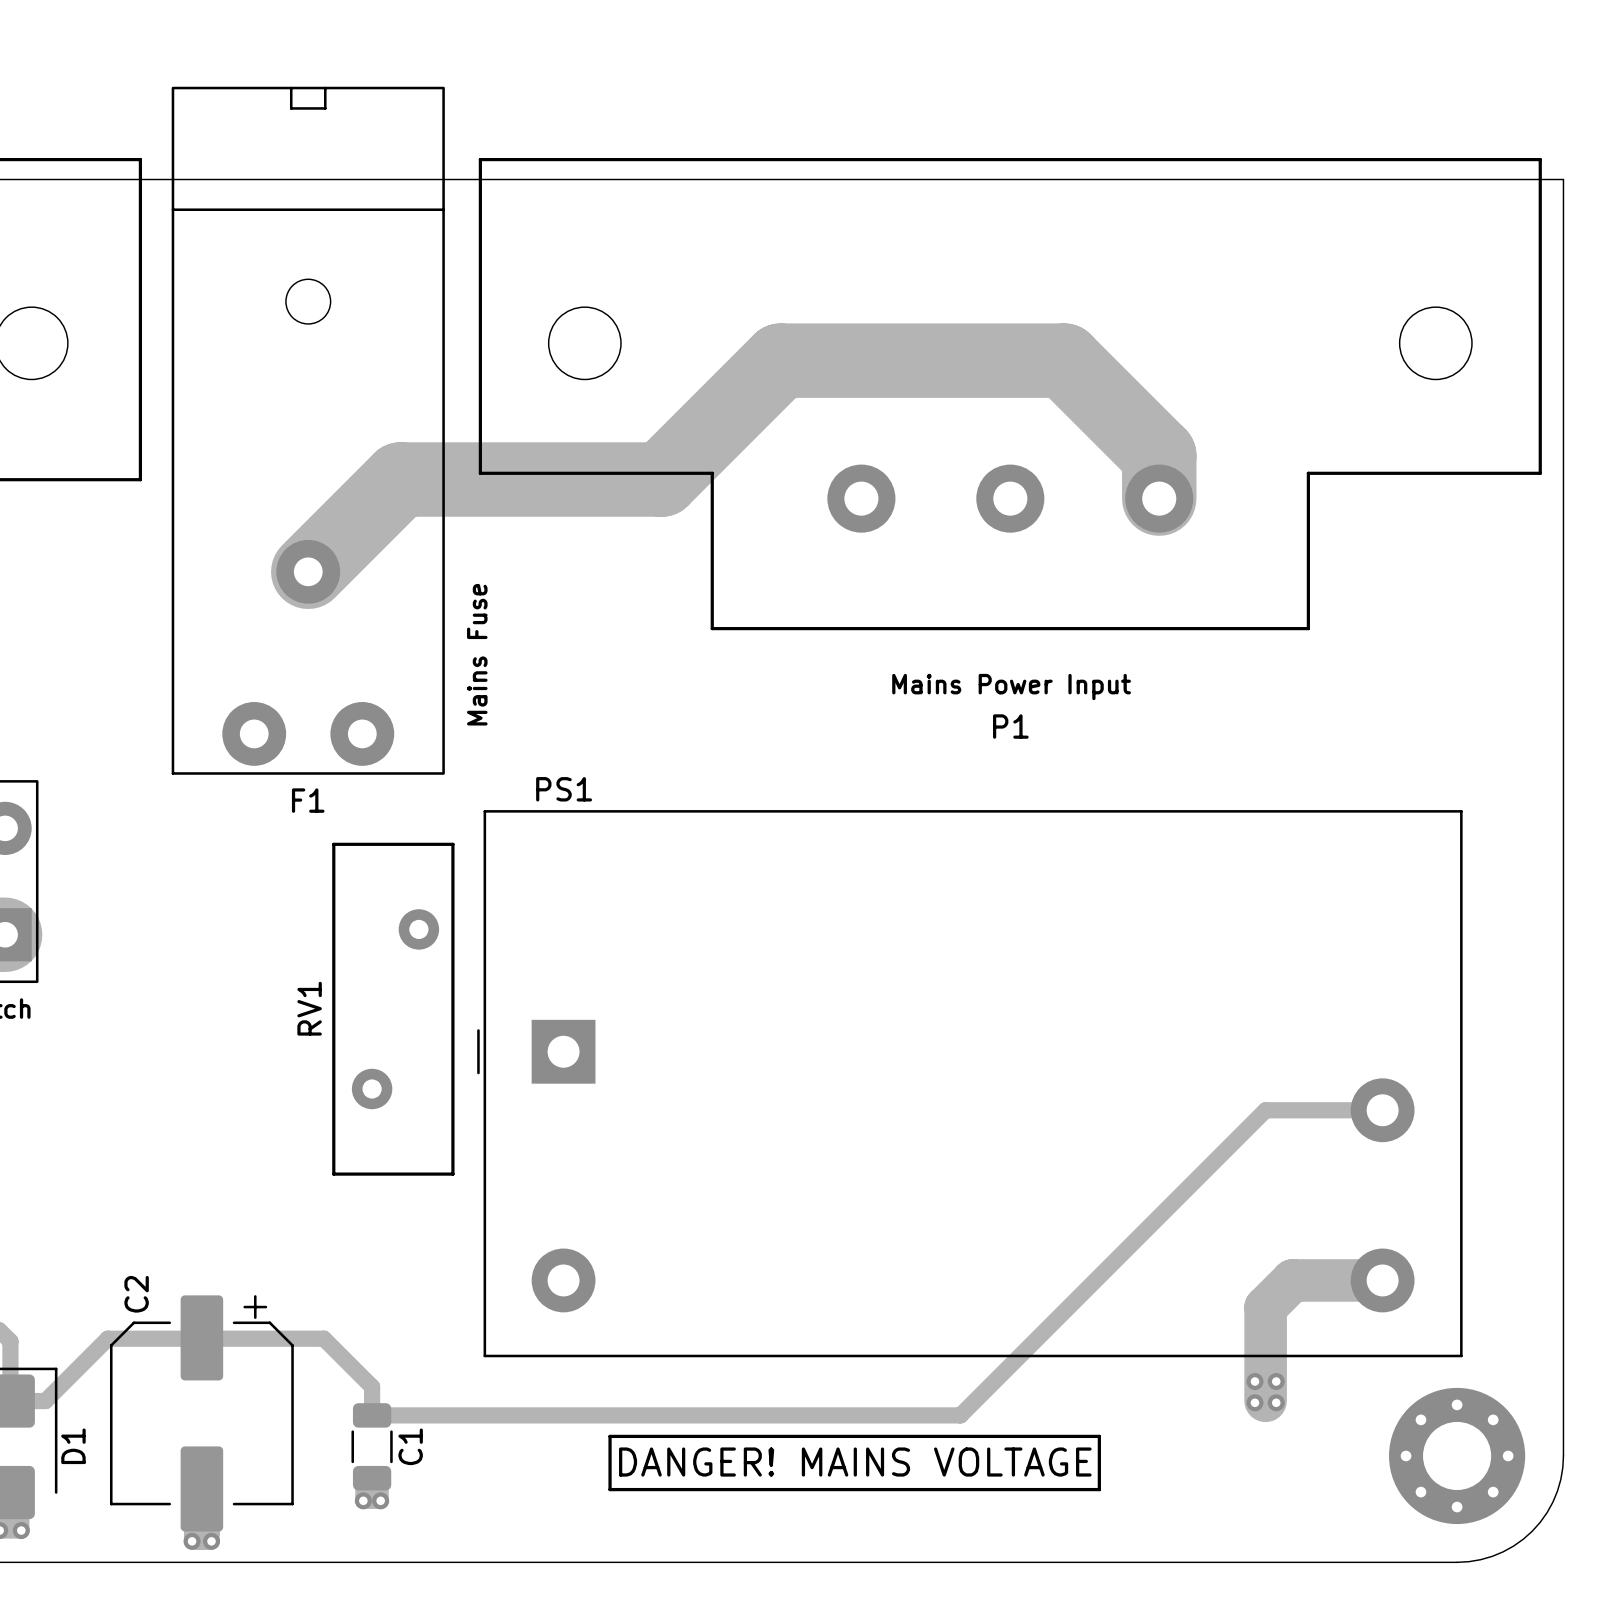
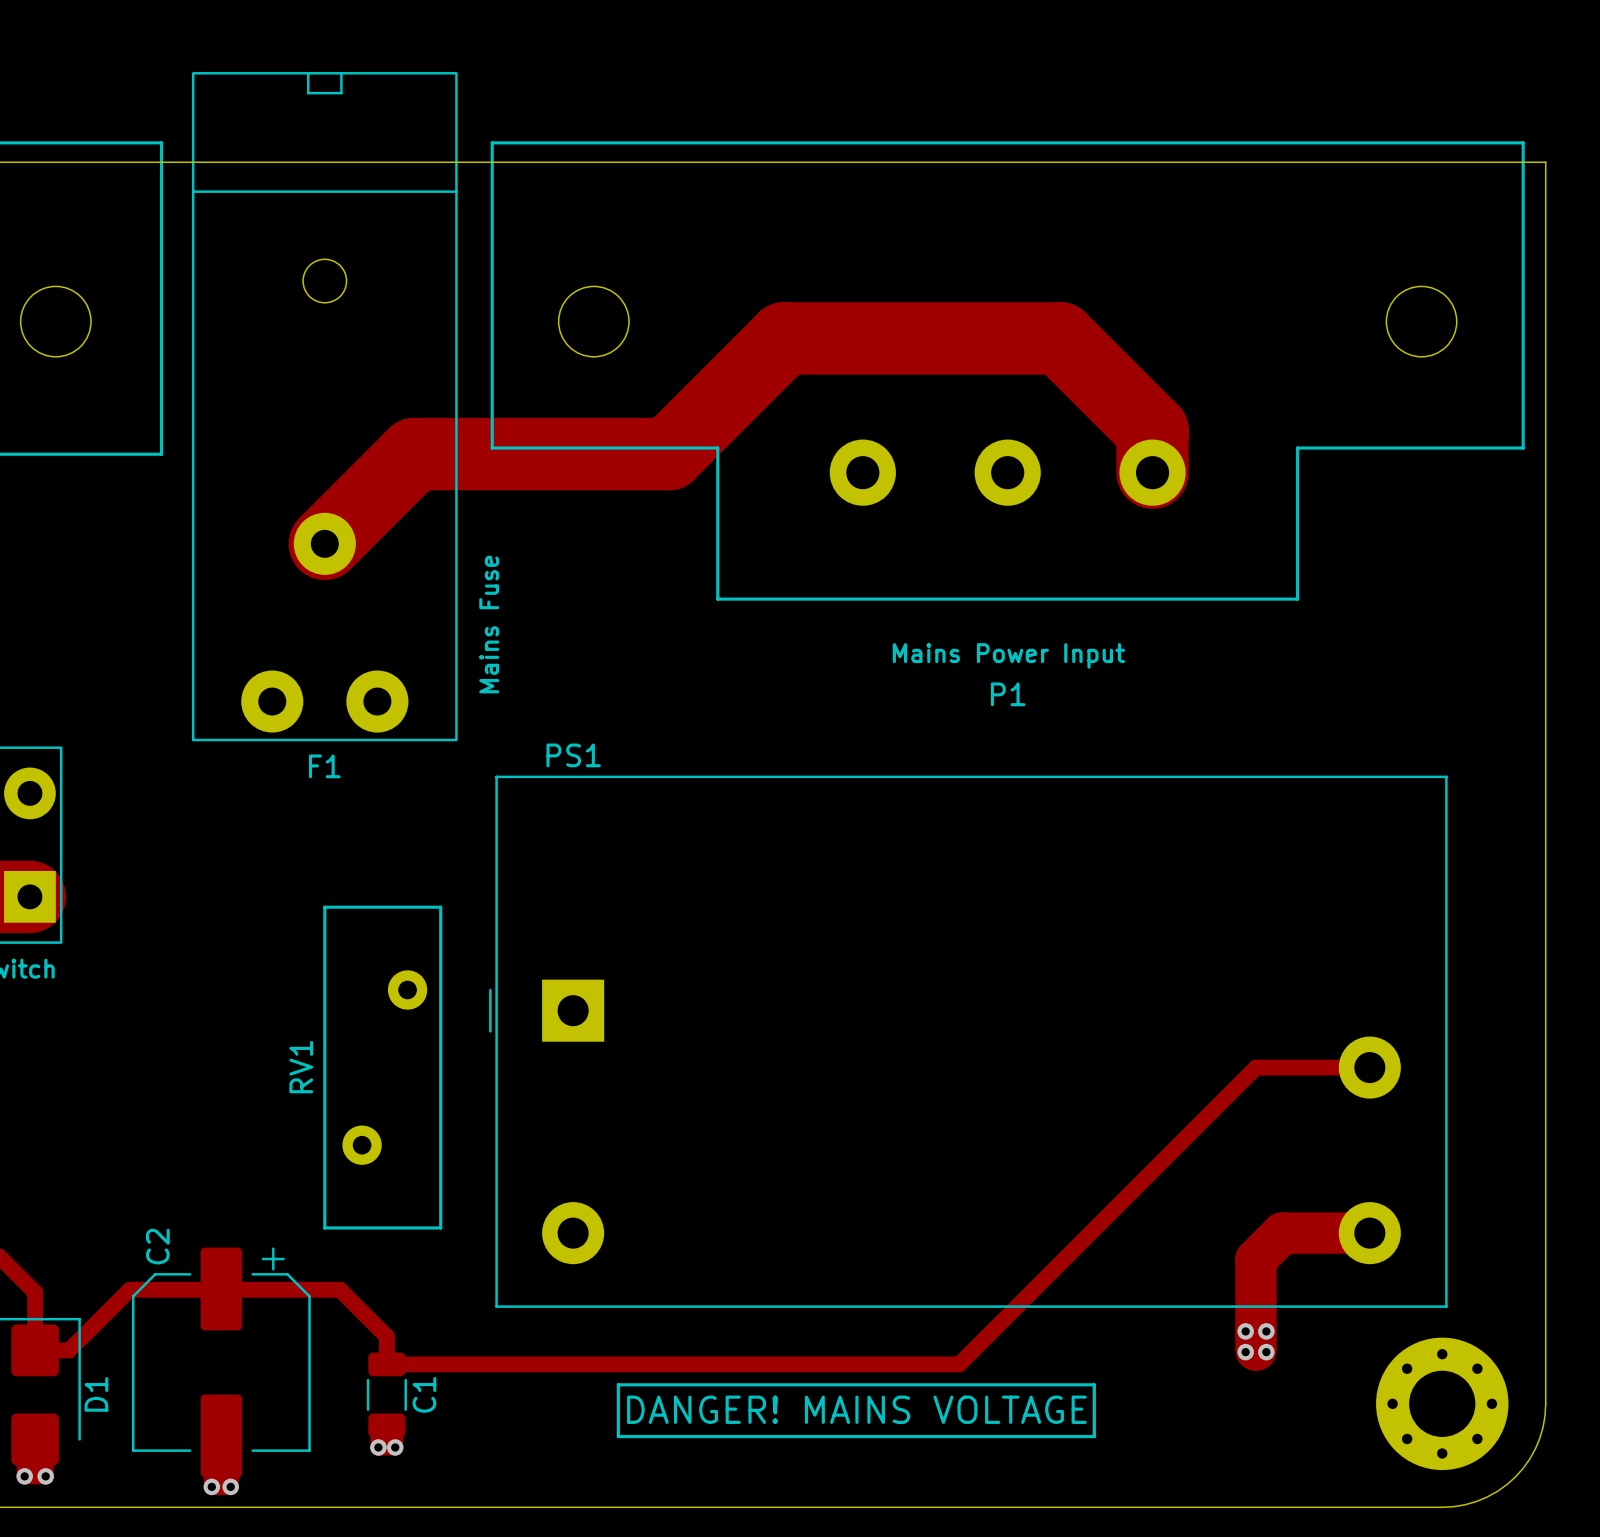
RV1 position: (393, 1009) -> (382, 1067)

